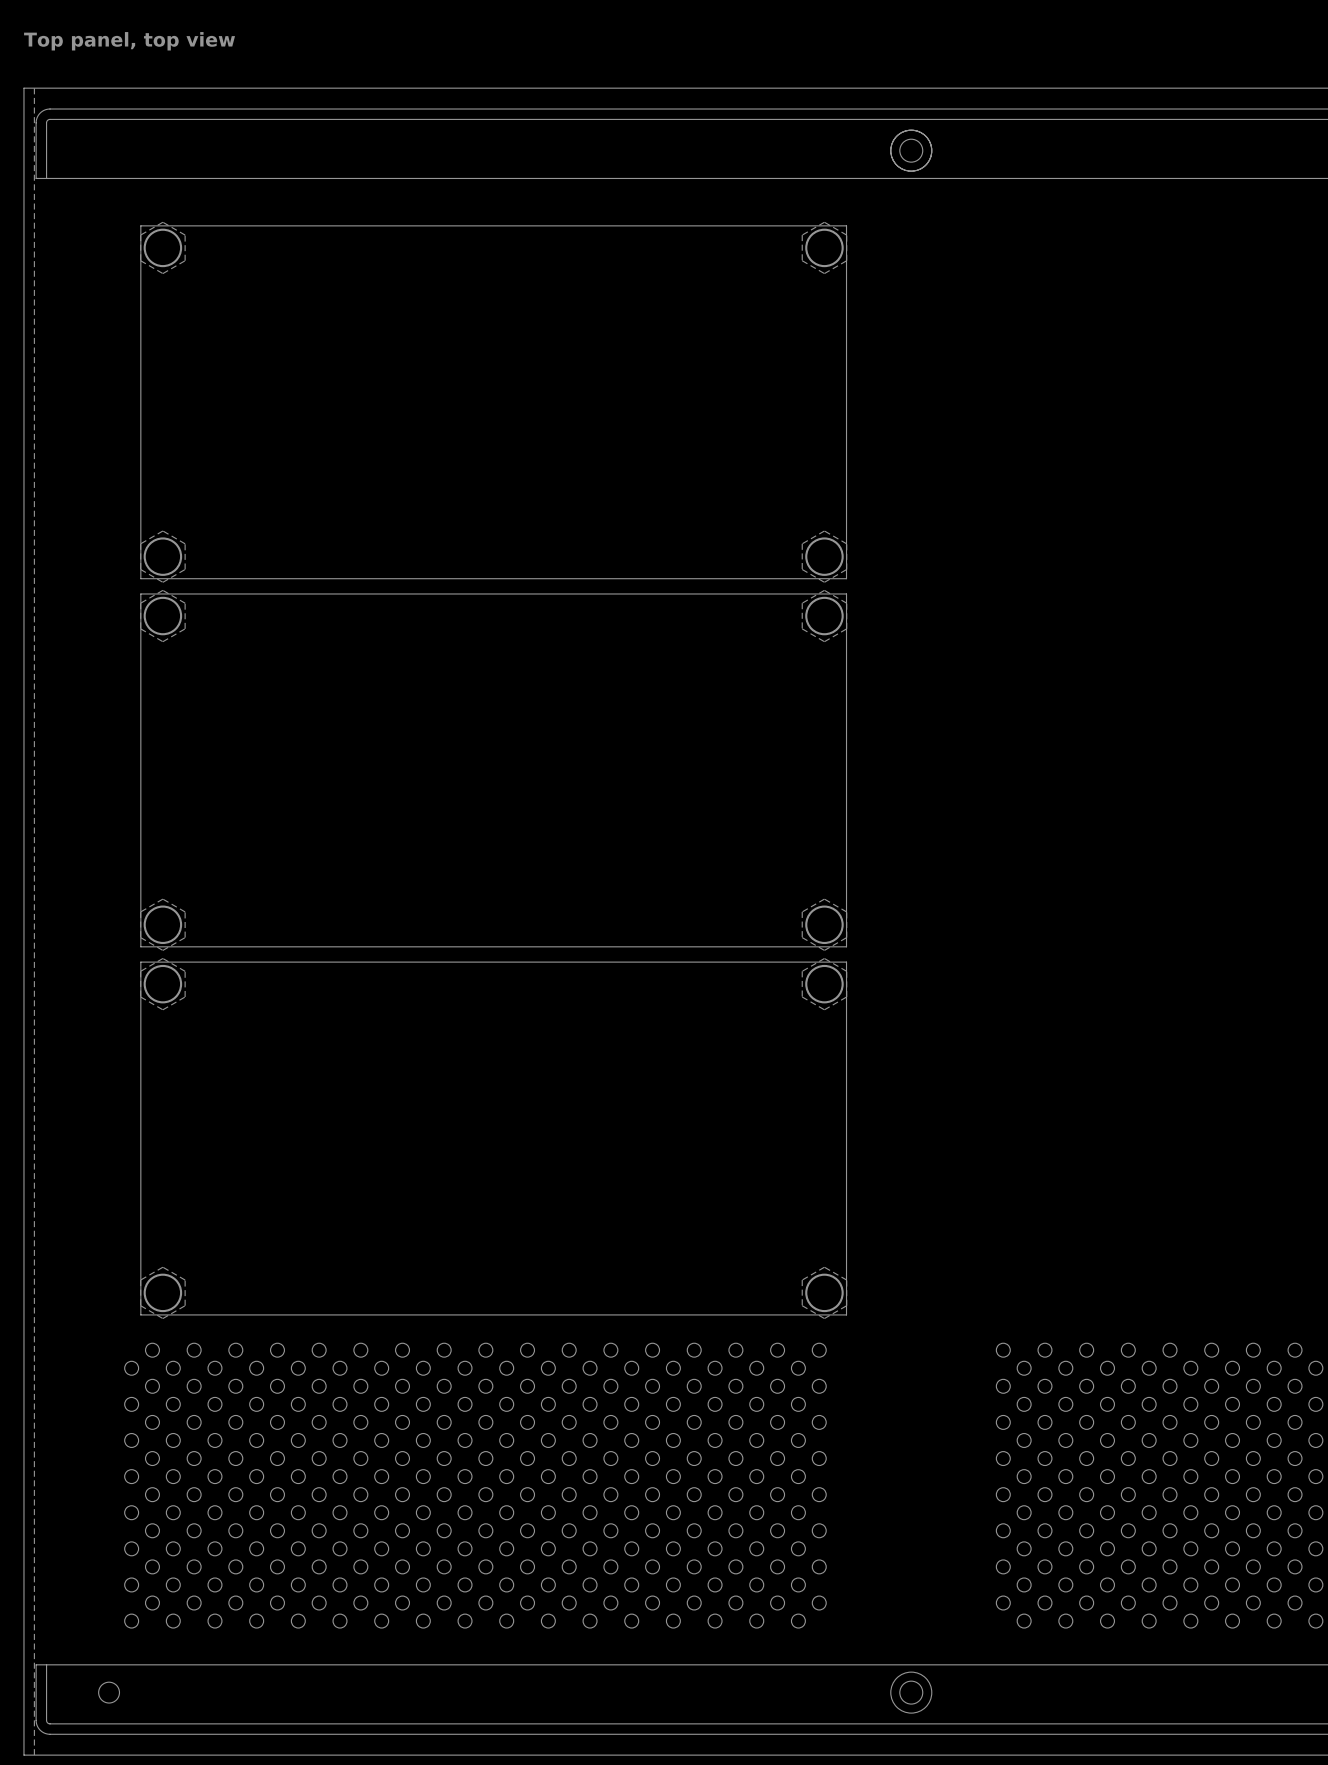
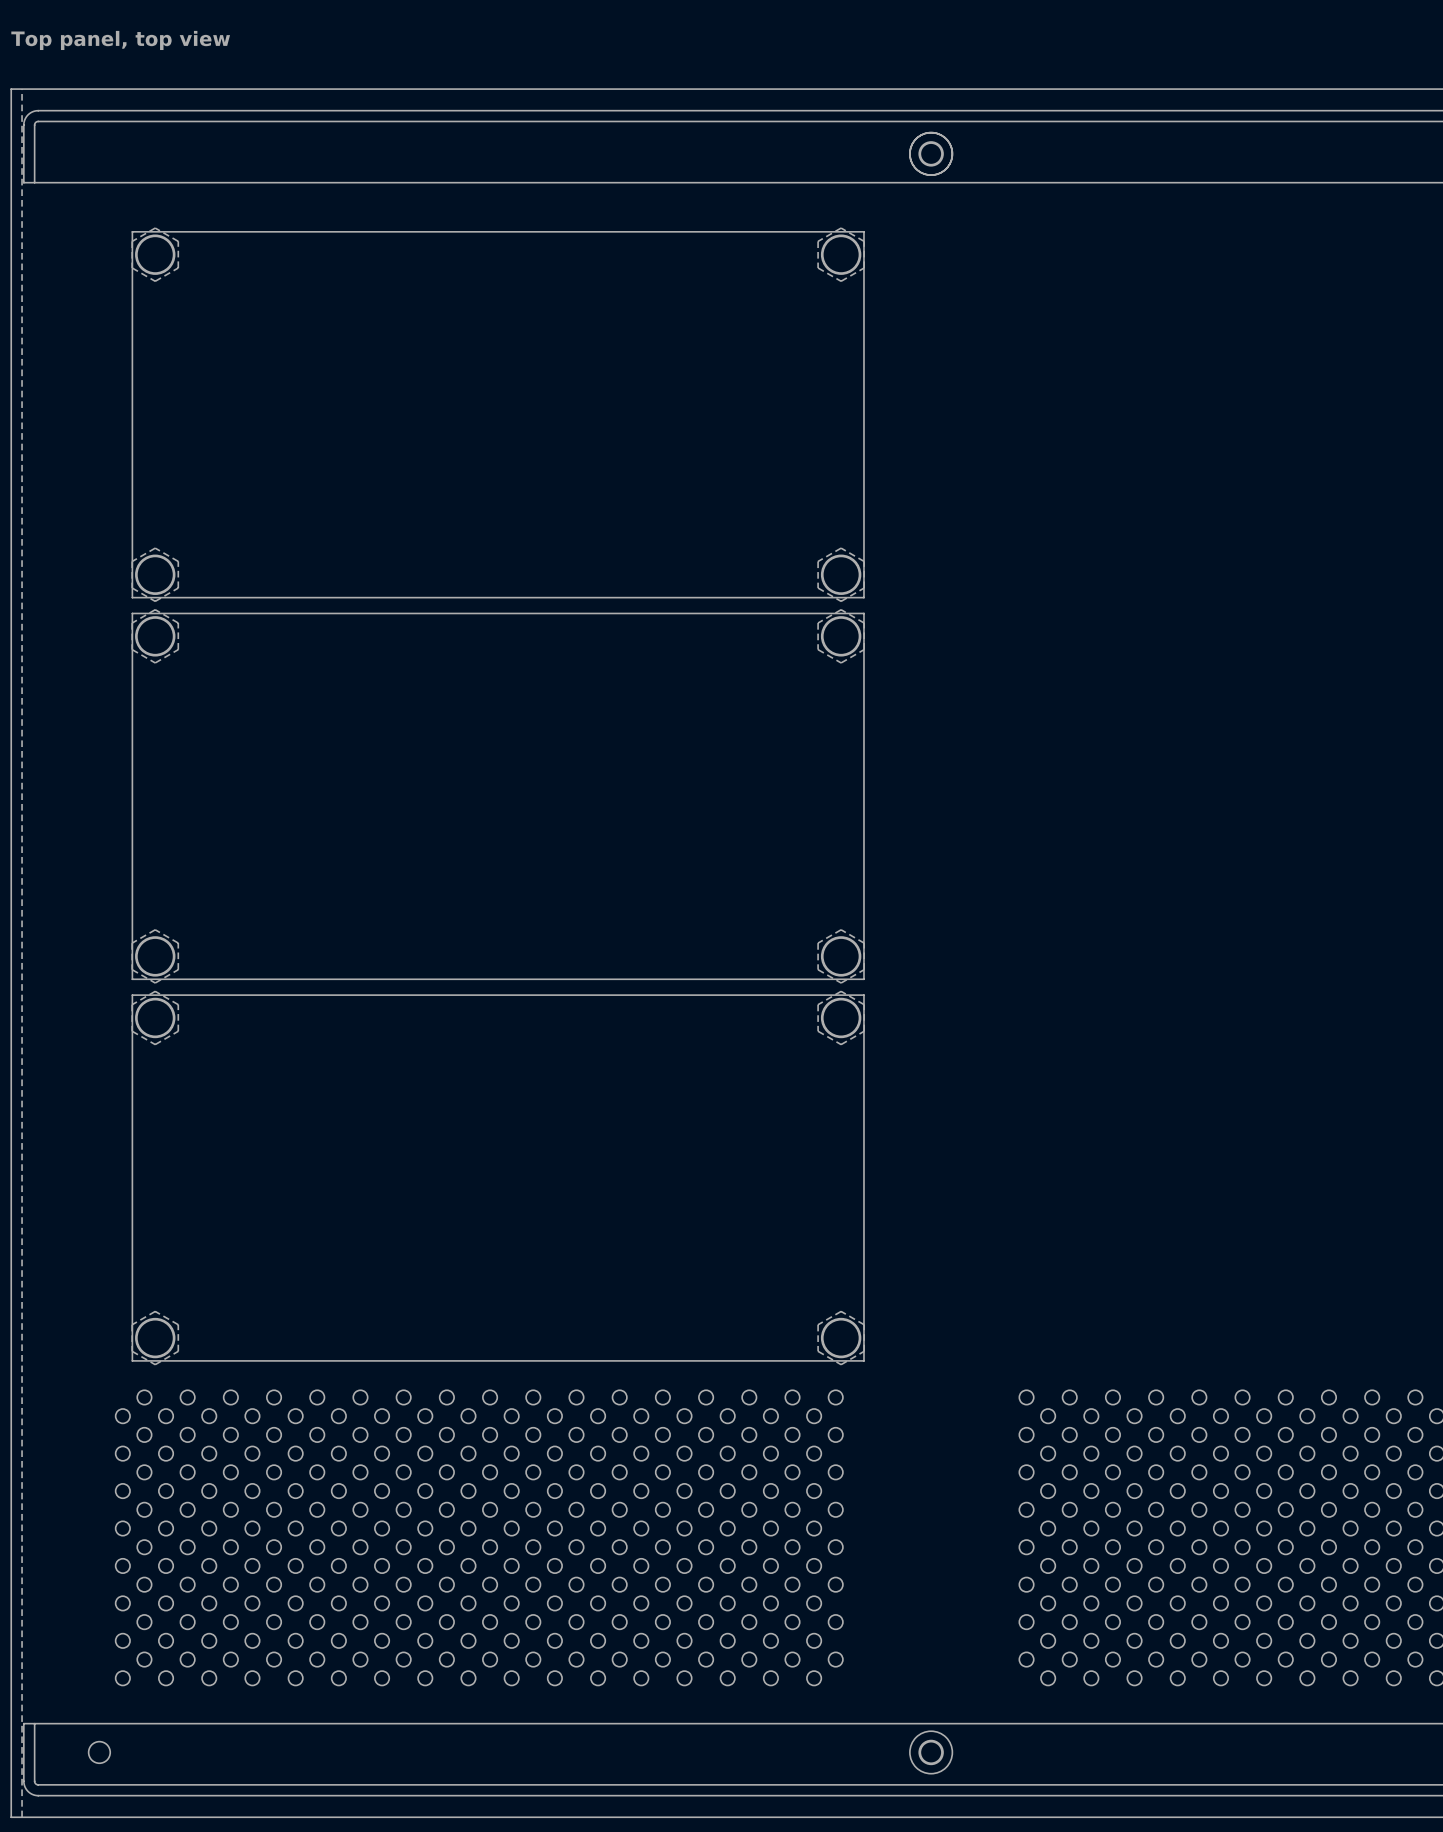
drawing: none -> [919, 142, 943, 166]
drawing: none -> [919, 1741, 943, 1764]

